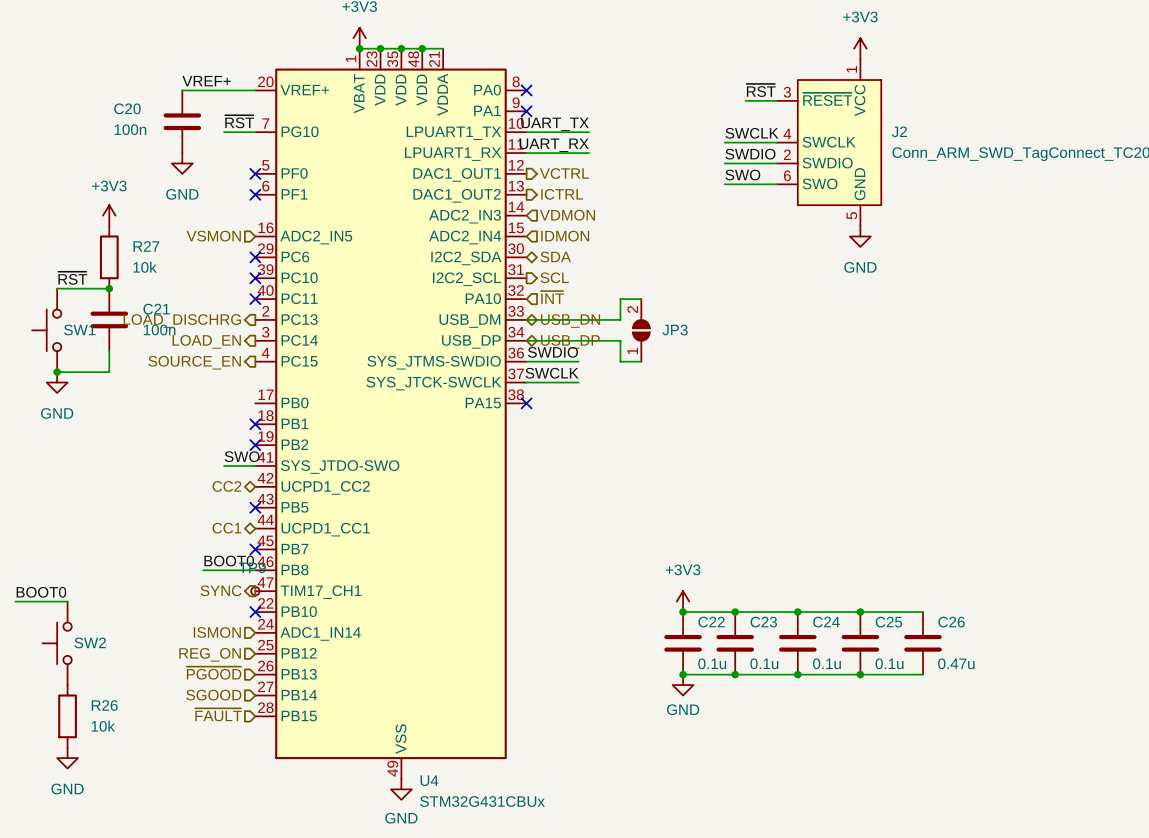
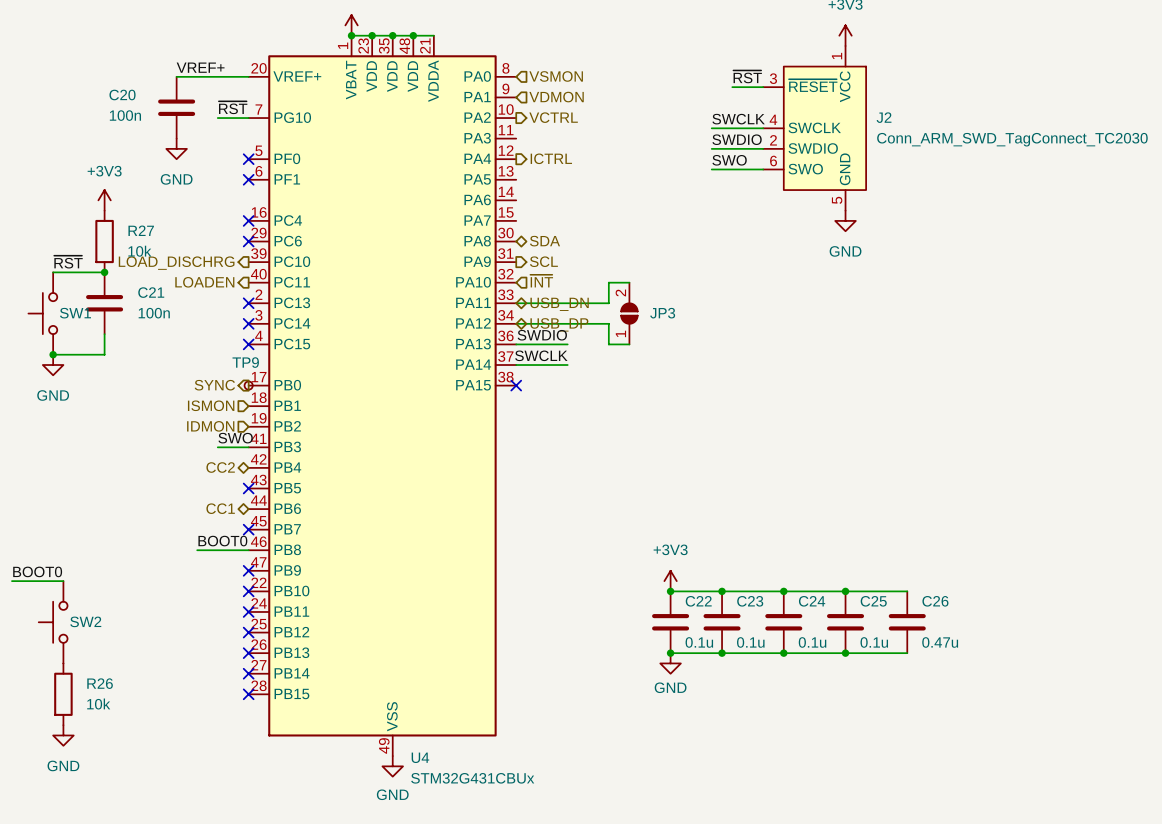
U4 symbol: [255, 48, 527, 779] -> [248, 35, 517, 757]
no-connect mark: (526, 90) -> none
hierarchical label: none -> VSMON (556, 76)
no-connect mark: (526, 111) -> none
label: UART_TX (555, 124) -> none
hierarchical label: none -> VCTRL (553, 117)
wire: (526, 132) (589, 132) -> none
label: UART_RX (554, 145) -> none
wire: (526, 153) (589, 153) -> none
hierarchical label: VCTRL (564, 173) -> ICTRL (551, 158)
hierarchical label: ICTRL (562, 194) -> none
hierarchical label position: VDMON (567, 215) -> VDMON (556, 97)
hierarchical label: VSMON (213, 236) -> none
no-connect mark: none -> (248, 220)
hierarchical label: IDMON (565, 236) -> none
no-connect mark: (255, 278) -> none
hierarchical label: none -> LOADEN (204, 282)
no-connect mark: (255, 299) -> none
no-connect mark: none -> (248, 303)
hierarchical label position: LOAD_DISCHRG (182, 320) -> LOAD_DISCHRG (176, 263)
no-connect mark: none -> (248, 323)
hierarchical label: LOAD_EN (206, 341) -> none
no-connect mark: none -> (248, 344)
hierarchical label: SOURCE_EN (194, 362) -> none
hierarchical label: none -> ISMON (211, 405)
no-connect mark: (255, 424) -> none
hierarchical label: none -> IDMON (210, 426)
no-connect mark: (255, 445) -> none
hierarchical label position: SYNC (221, 590) -> SYNC (214, 385)
no-connect mark: none -> (248, 570)
TP9 position: (255, 591) -> (248, 385)
hierarchical label: ISMON (217, 632) -> none
no-connect mark: none -> (248, 611)
no-connect mark: none -> (248, 632)
hierarchical label: REG_ON (210, 654) -> none
hierarchical label: ~{PGOOD} (214, 673) -> none
no-connect mark: none -> (248, 653)
hierarchical label: SGOOD (213, 695) -> none
no-connect mark: none -> (248, 673)
hierarchical label: ~{FAULT} (218, 714) -> none
no-connect mark: none -> (248, 694)

